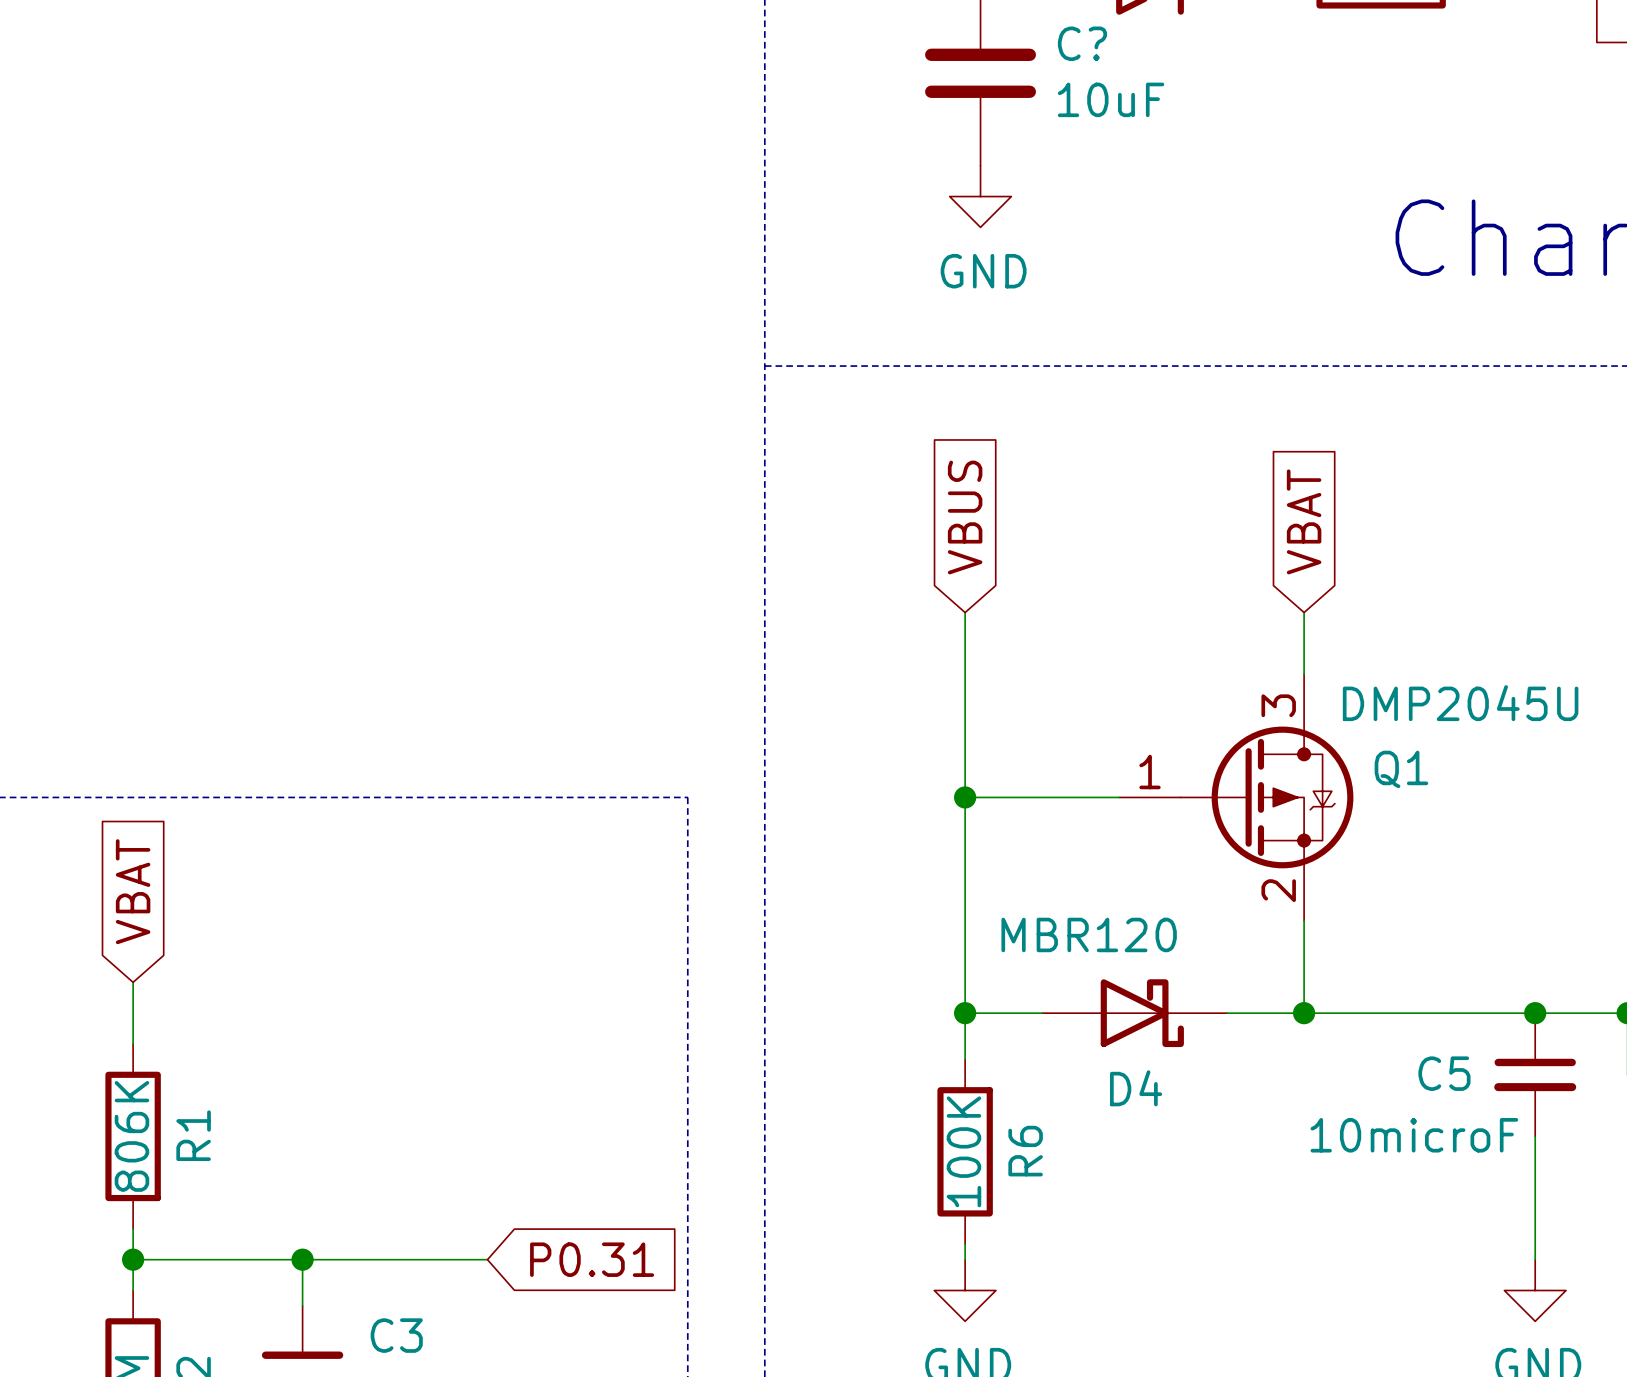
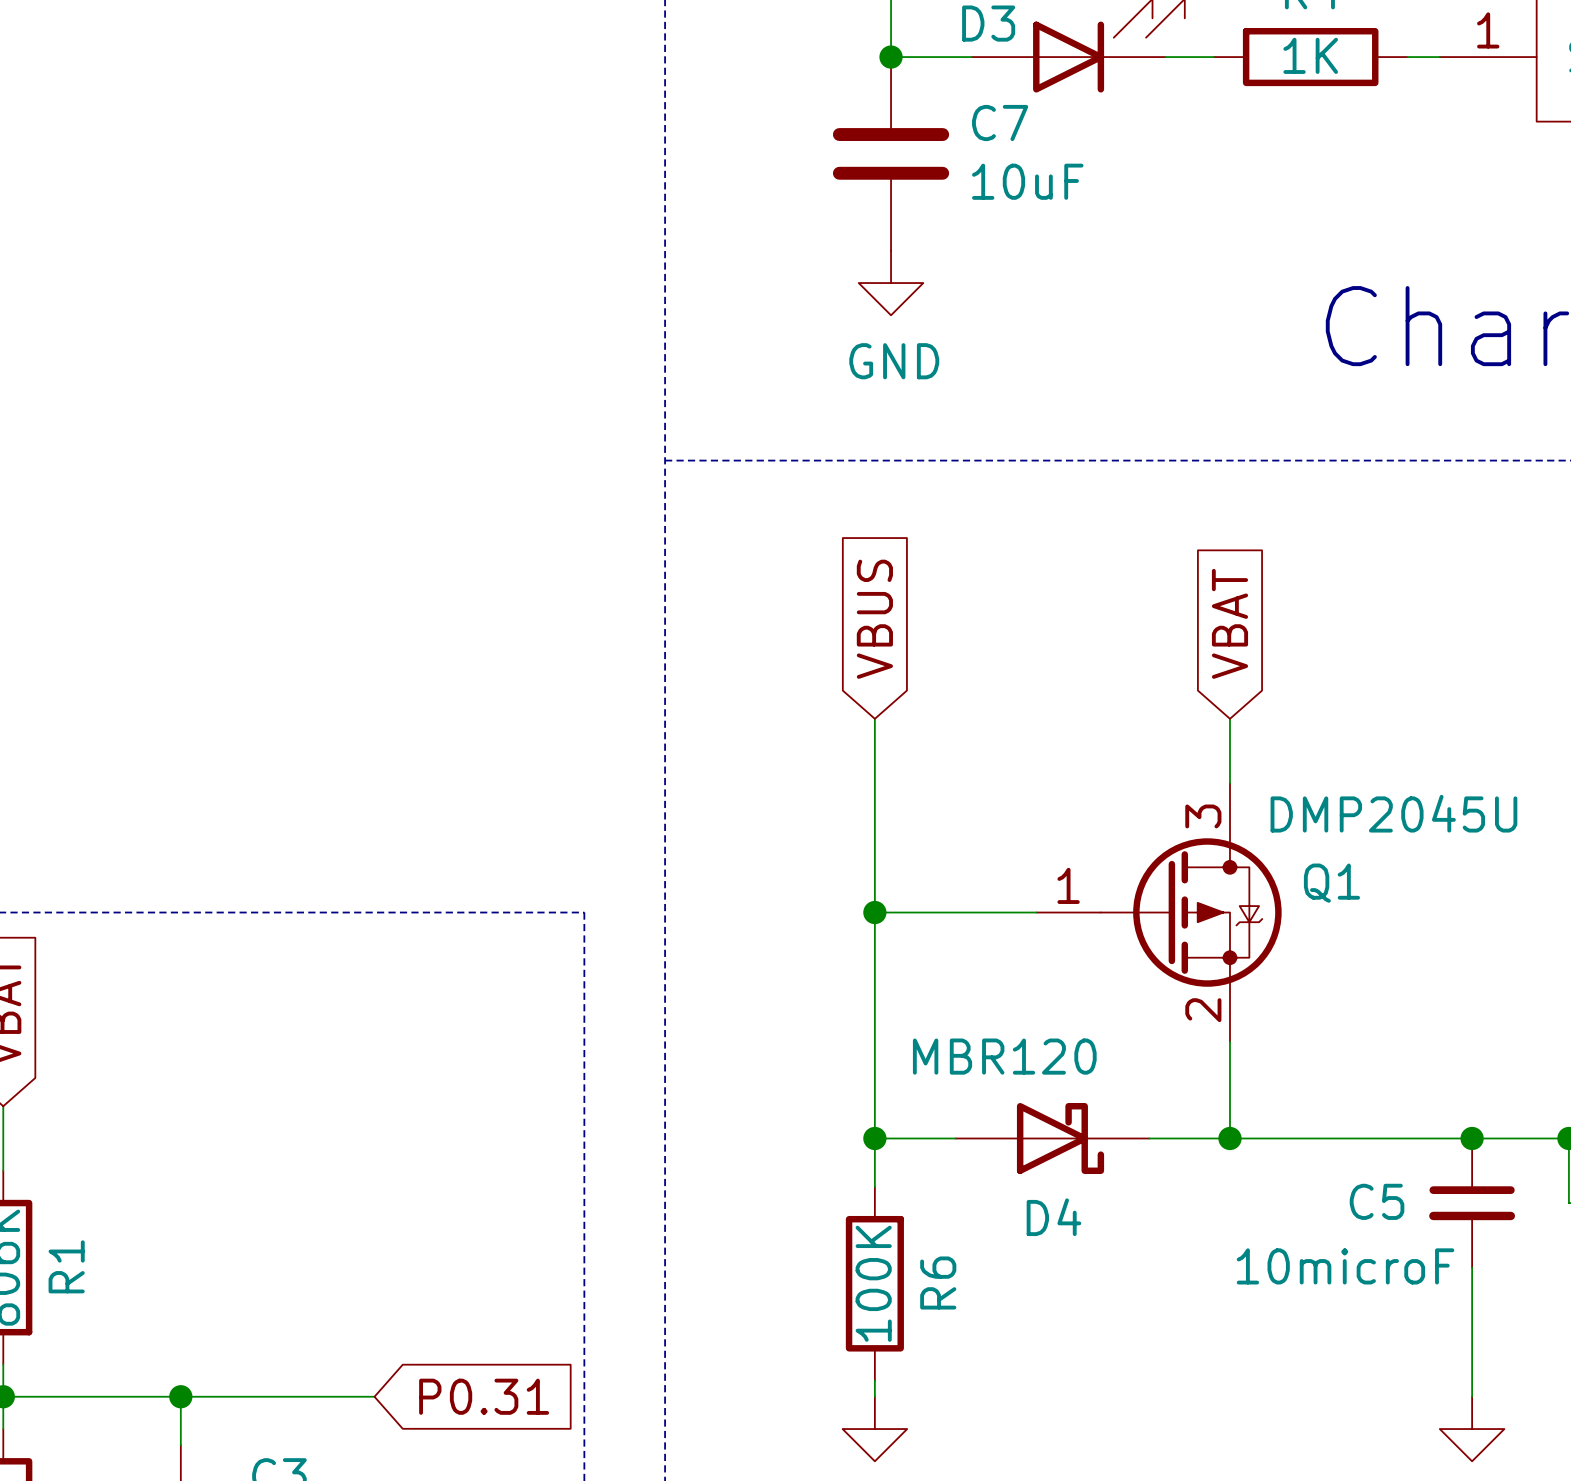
C? name: C? (1082, 43) -> C7 (1000, 123)

